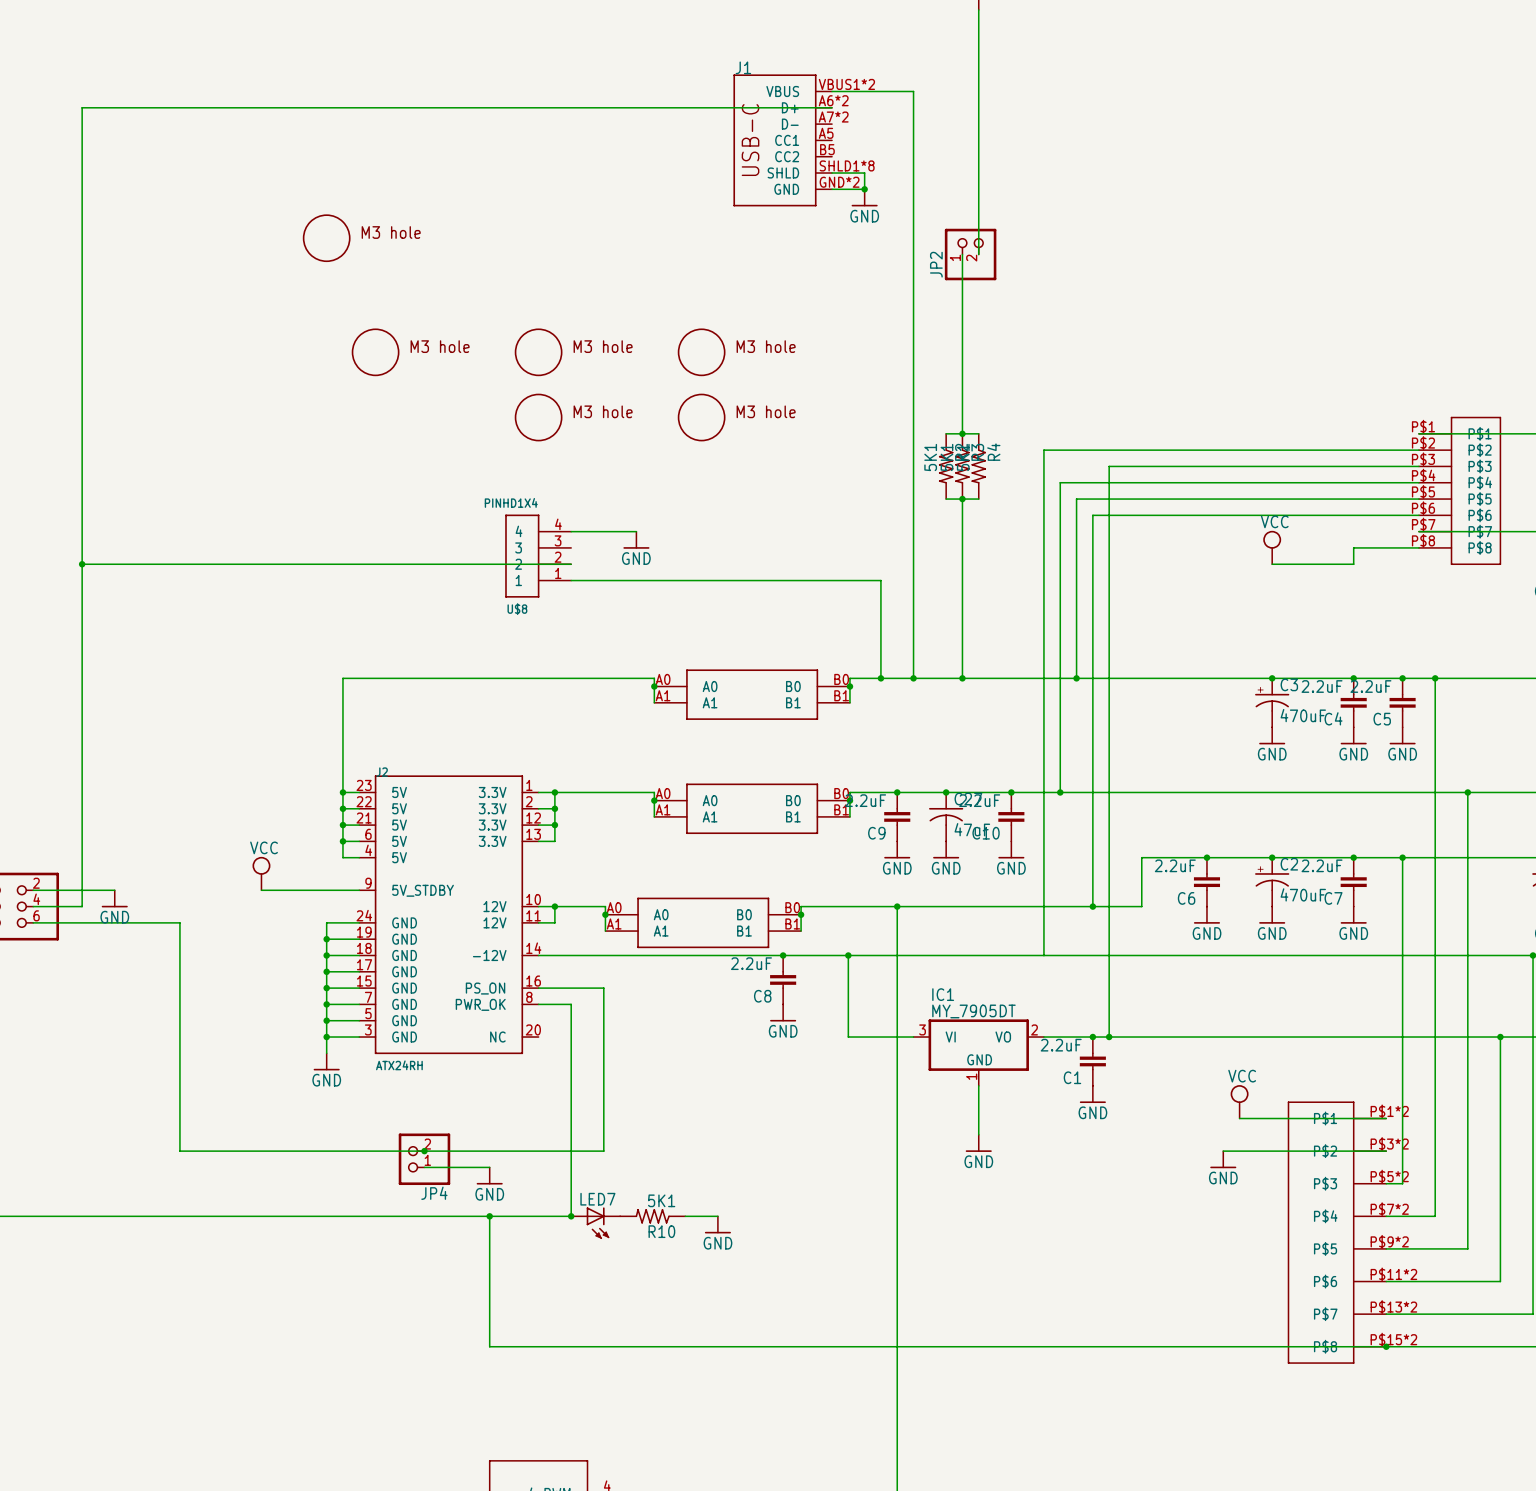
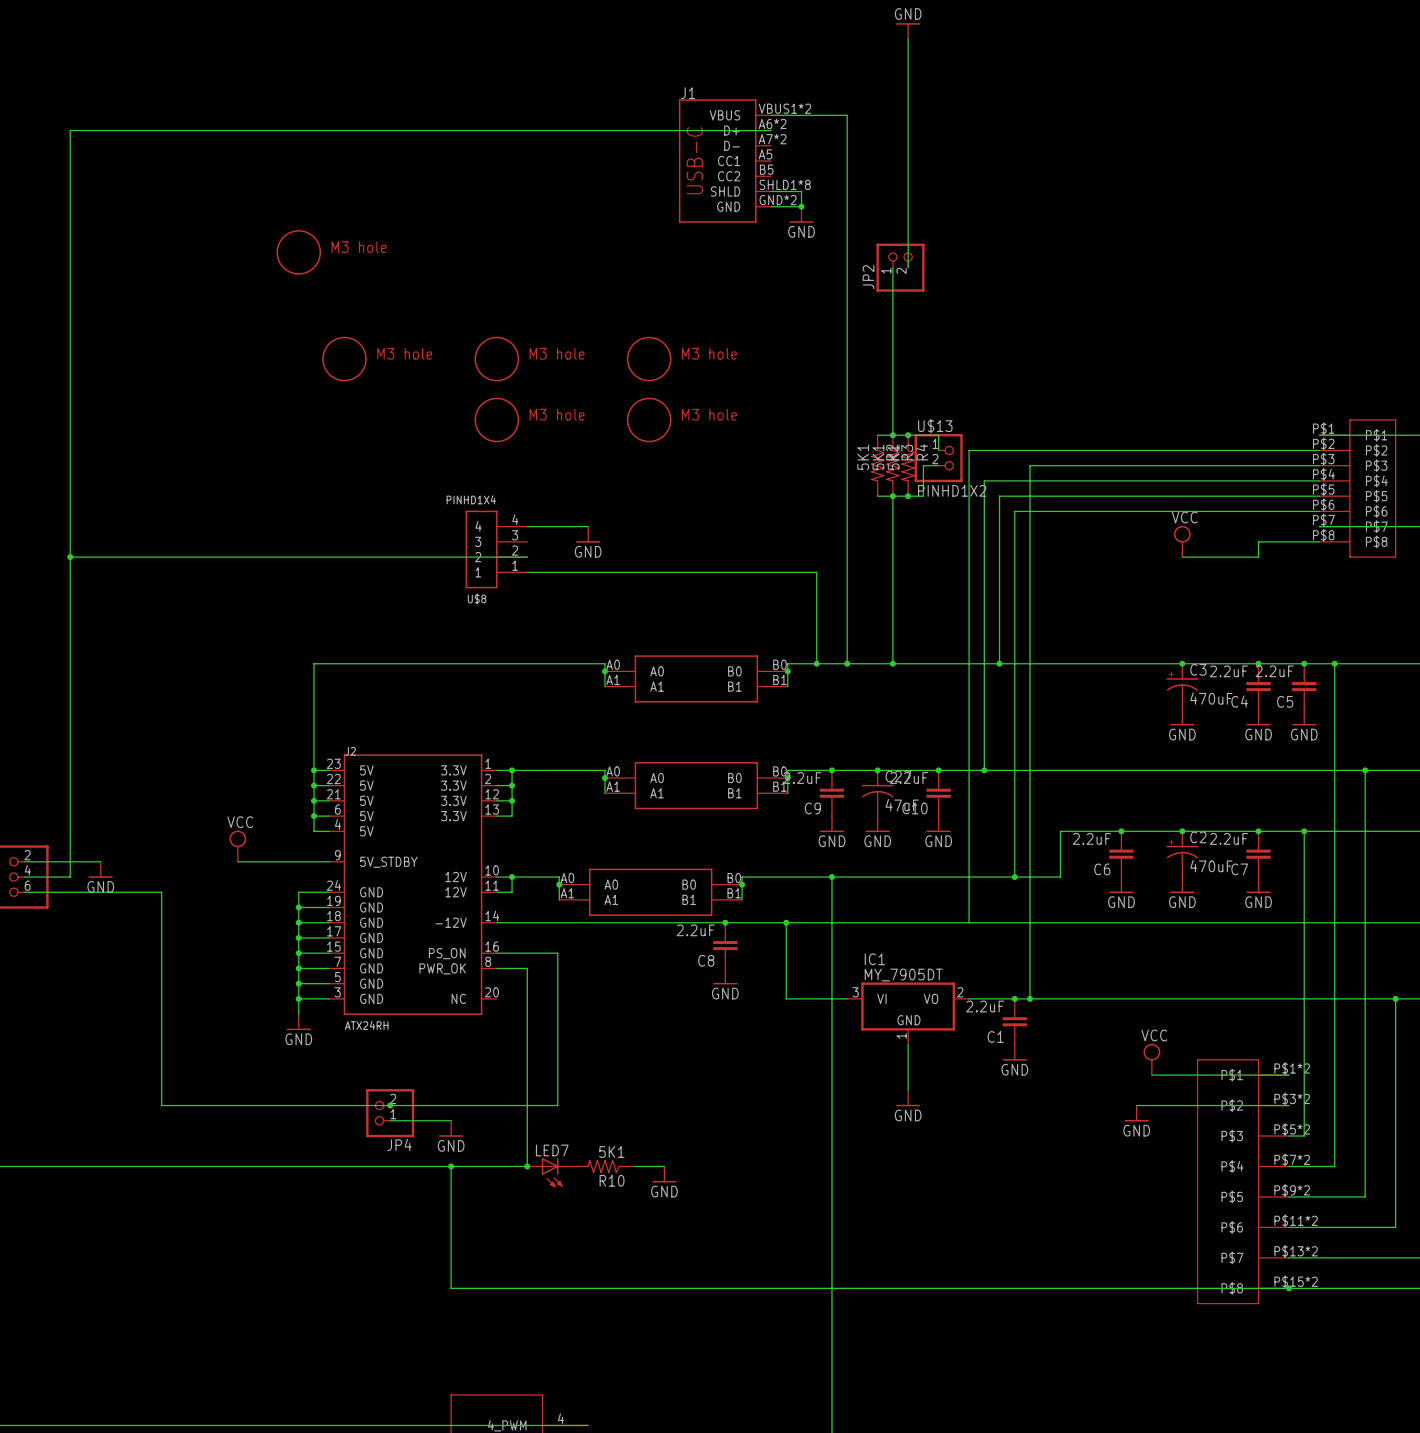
wire: none -> (908, 435) (938, 435) (938, 450)
junction: none -> (908, 435)
U$13: none -> PINHD1X2 (938, 458)
wire: none -> (938, 465) (923, 465) (923, 496) (908, 496)
junction: none -> (908, 496)

